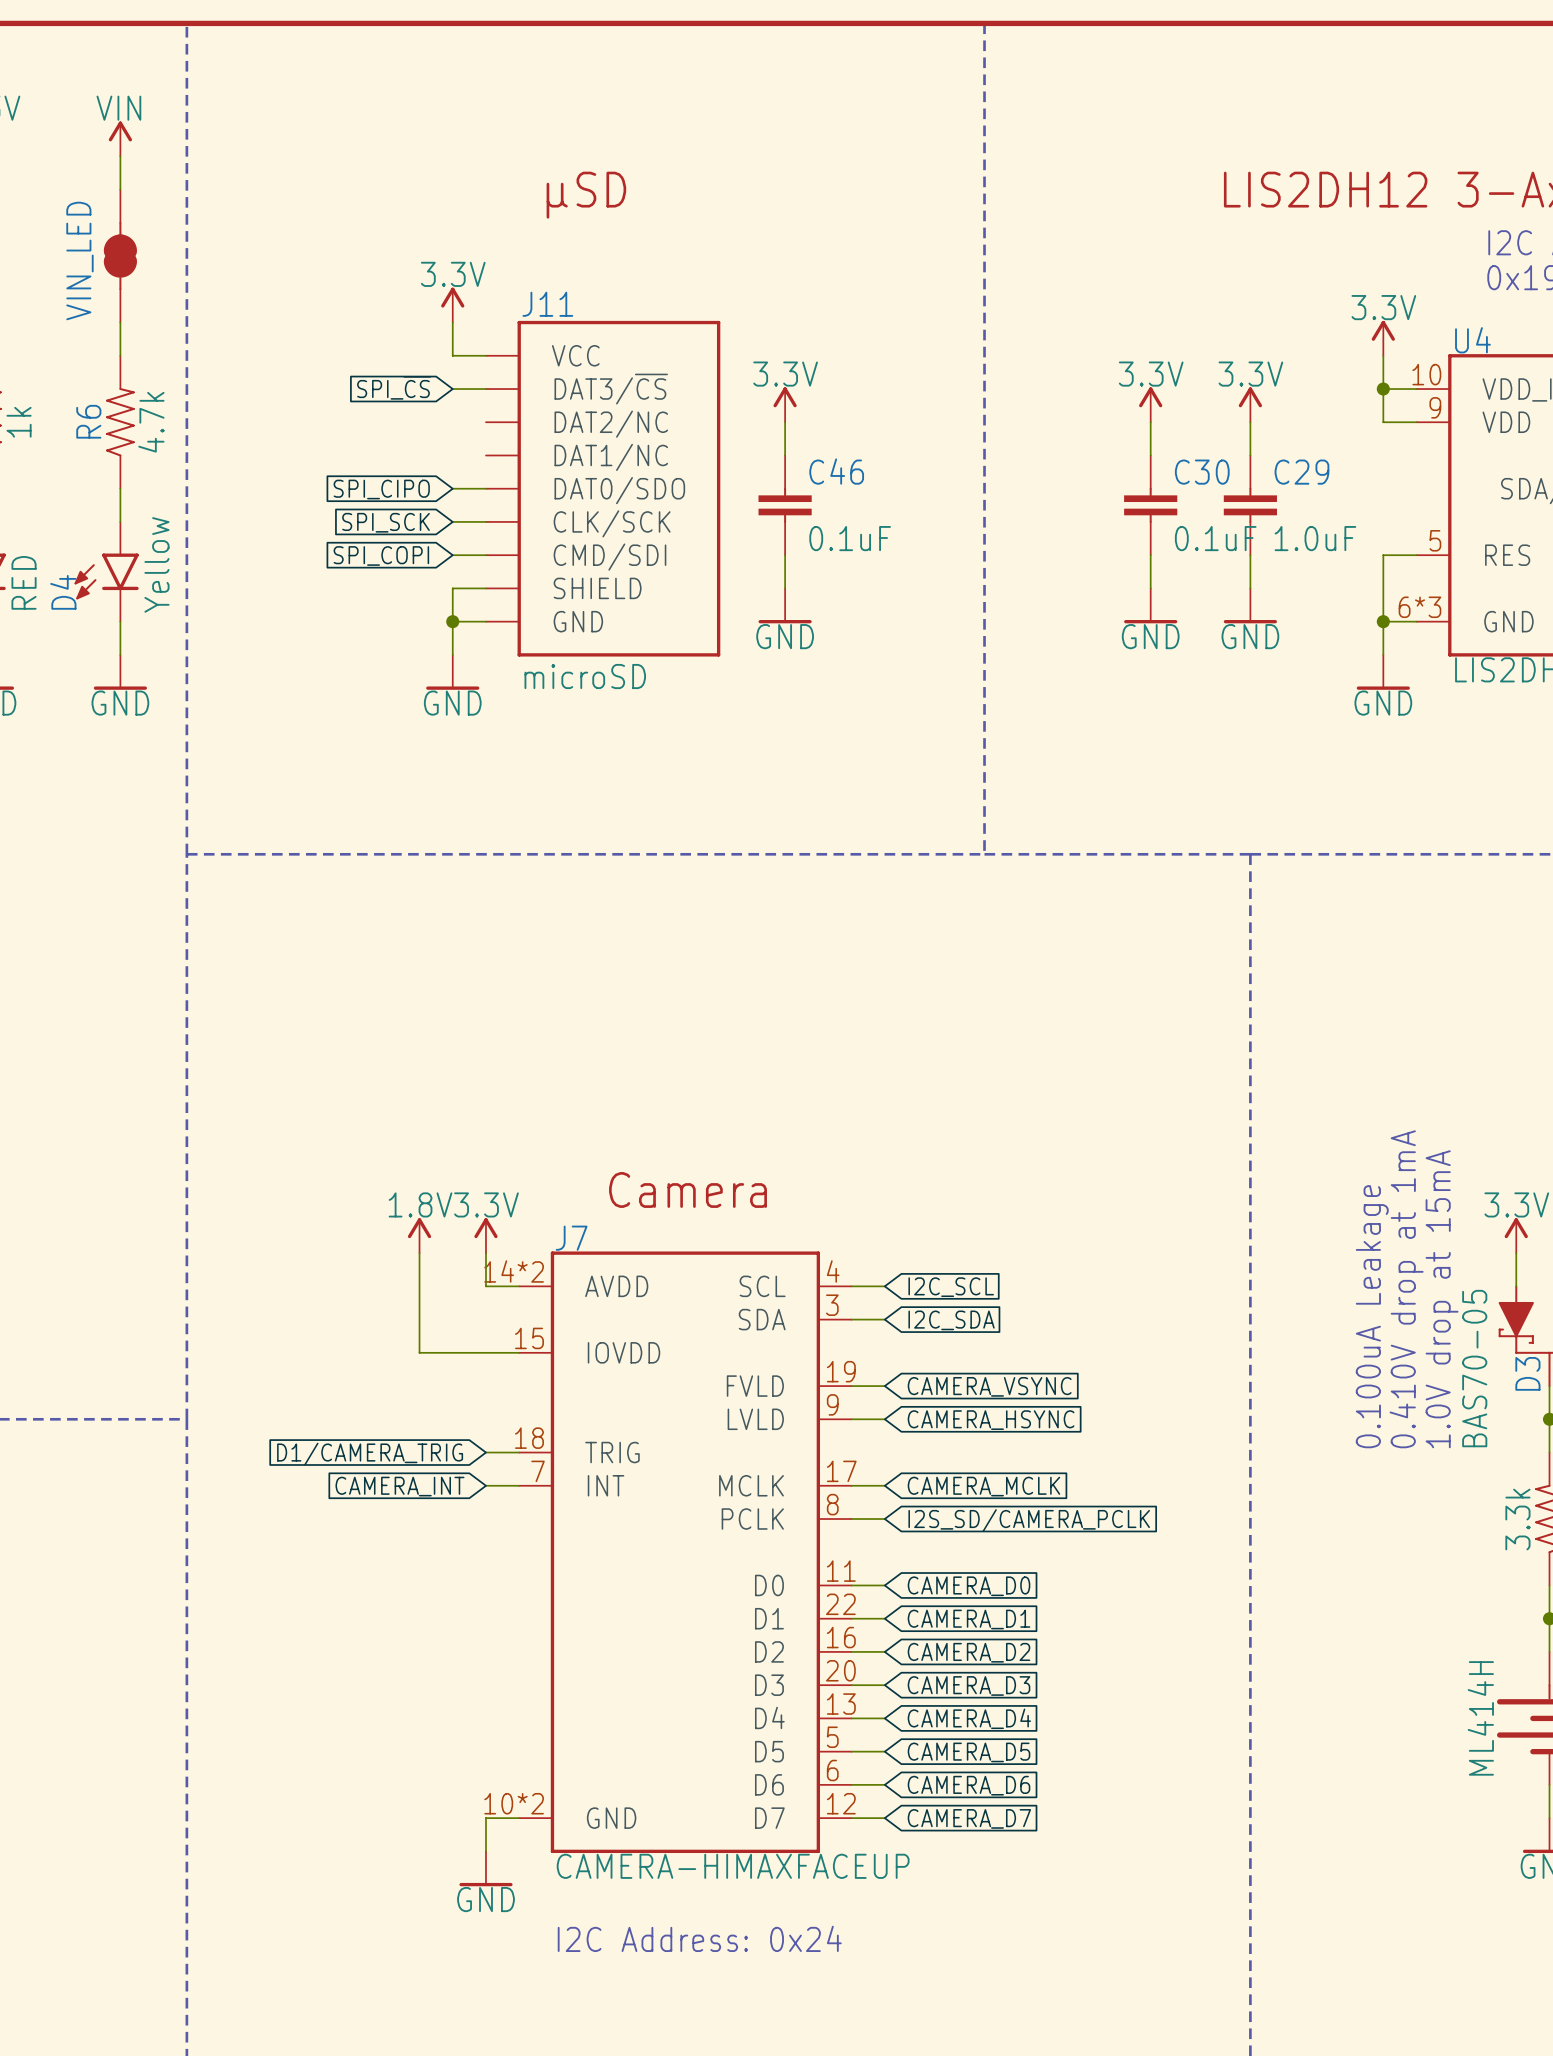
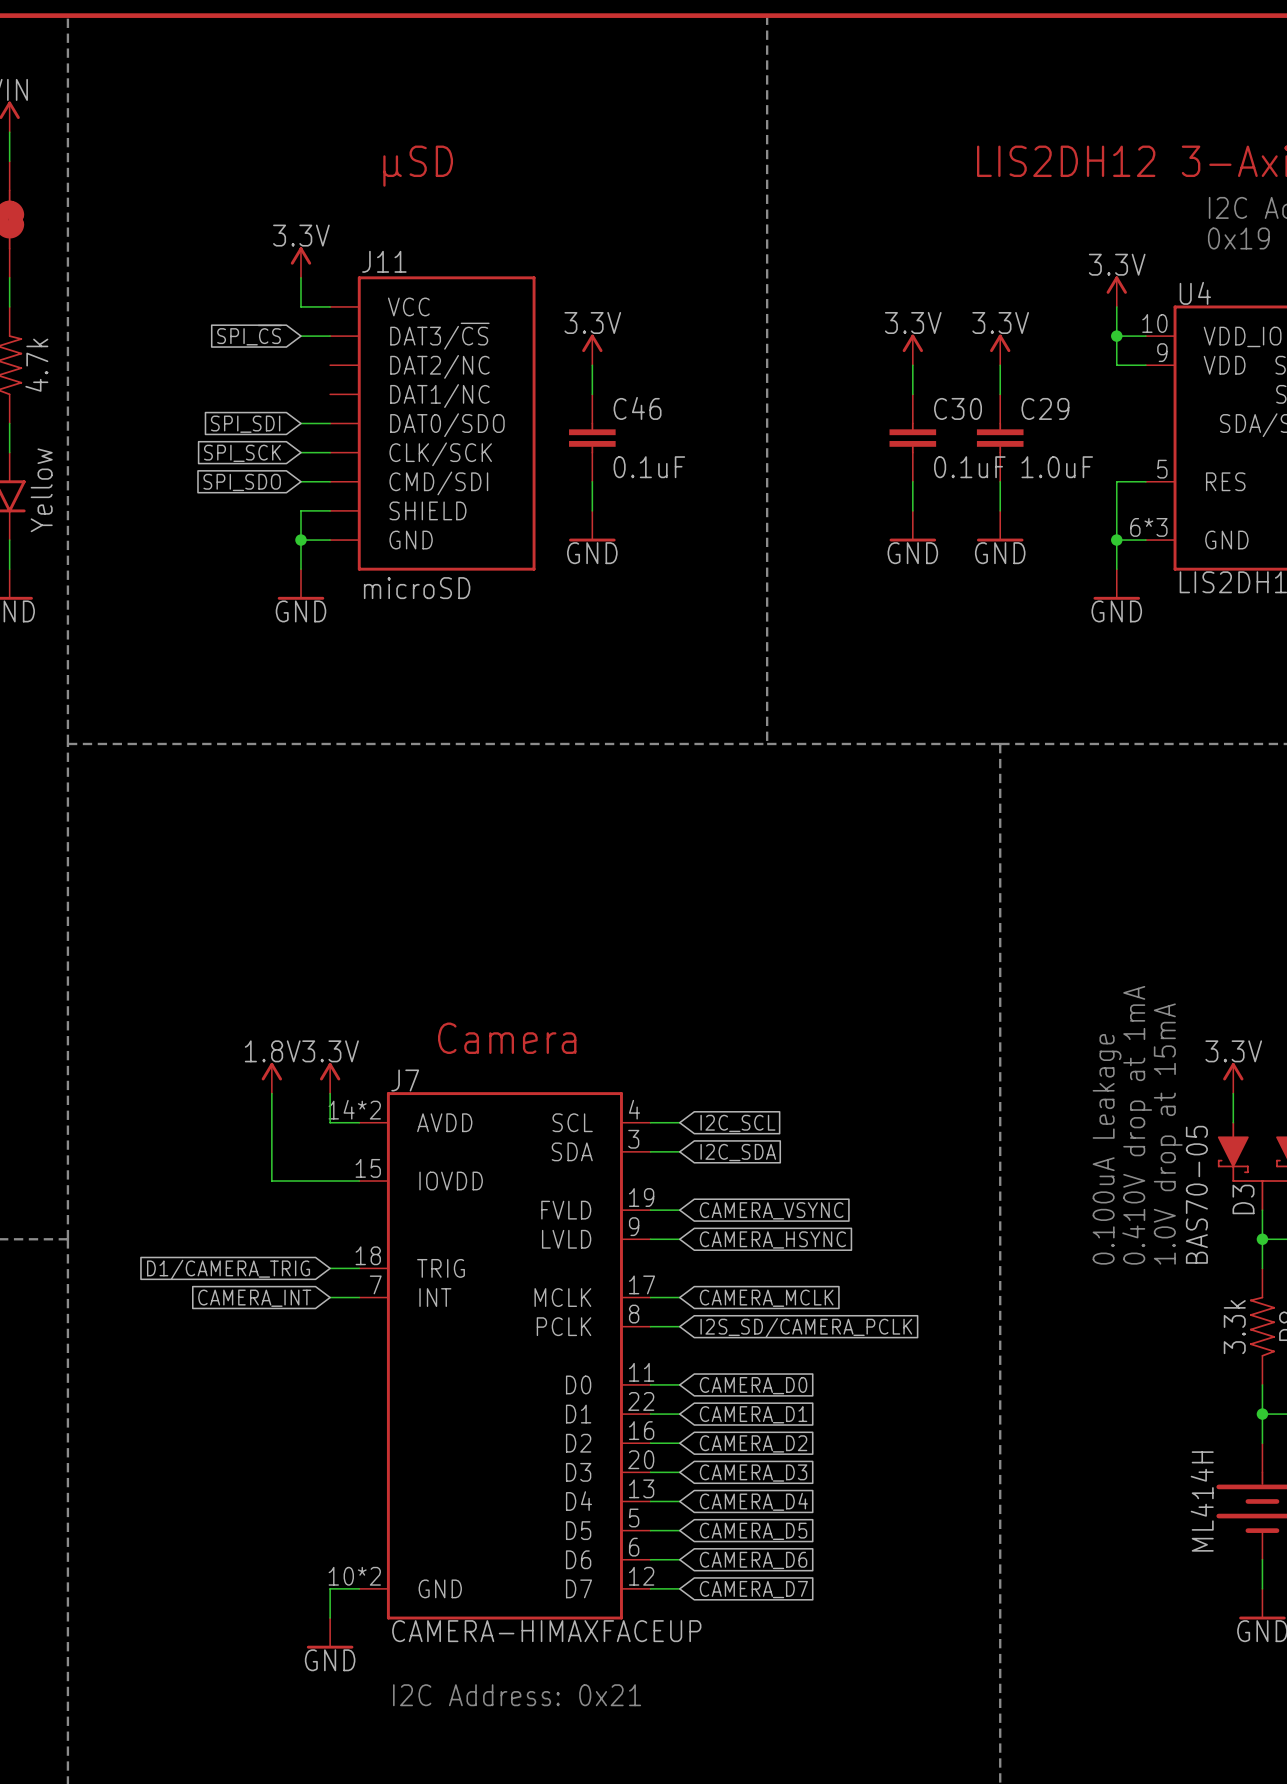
global label: SPI_CIPO (381, 489) -> SPI_SDI (245, 424)
global label: SPI_COPI (381, 555) -> SPI_SDO (242, 482)
text: I2C Address: 0x24 (699, 1938) -> I2C Address: 0x21 (517, 1695)

